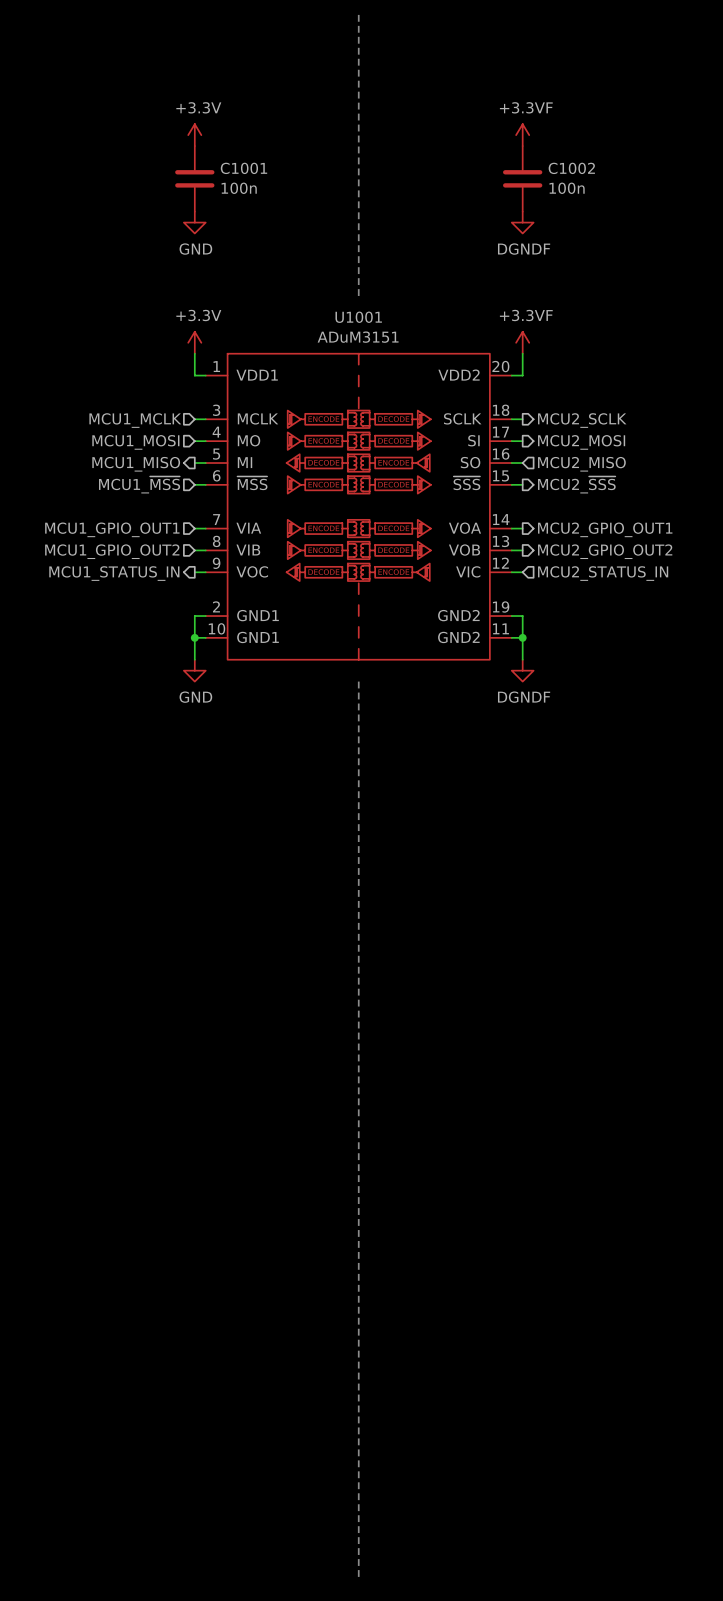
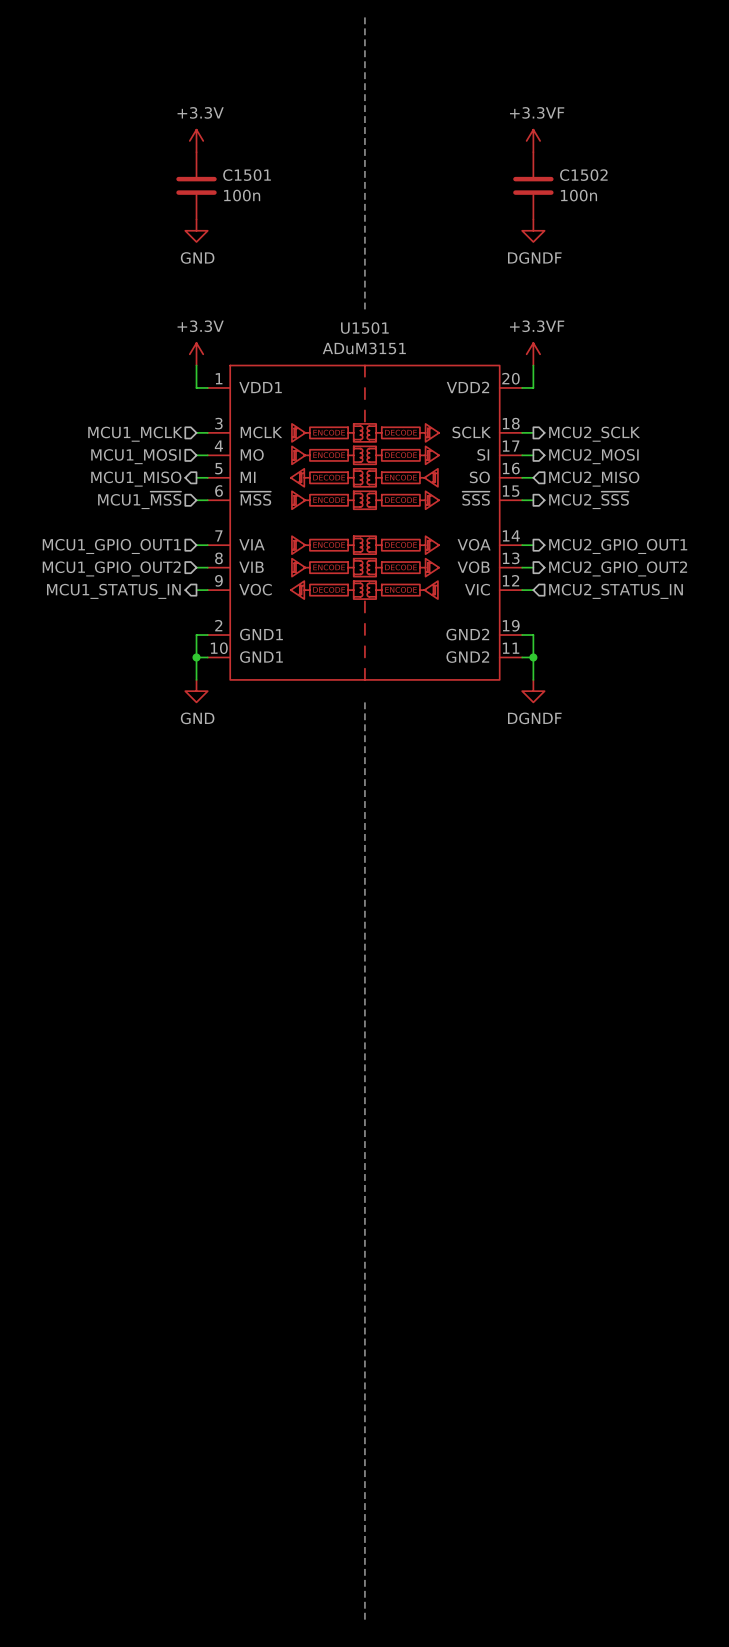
C1001 name: C1001 (243, 168) -> C1501 (247, 175)
C1002 name: C1002 (571, 168) -> C1502 (583, 175)
U1001 name: U1001 (358, 317) -> U1501 (364, 328)

